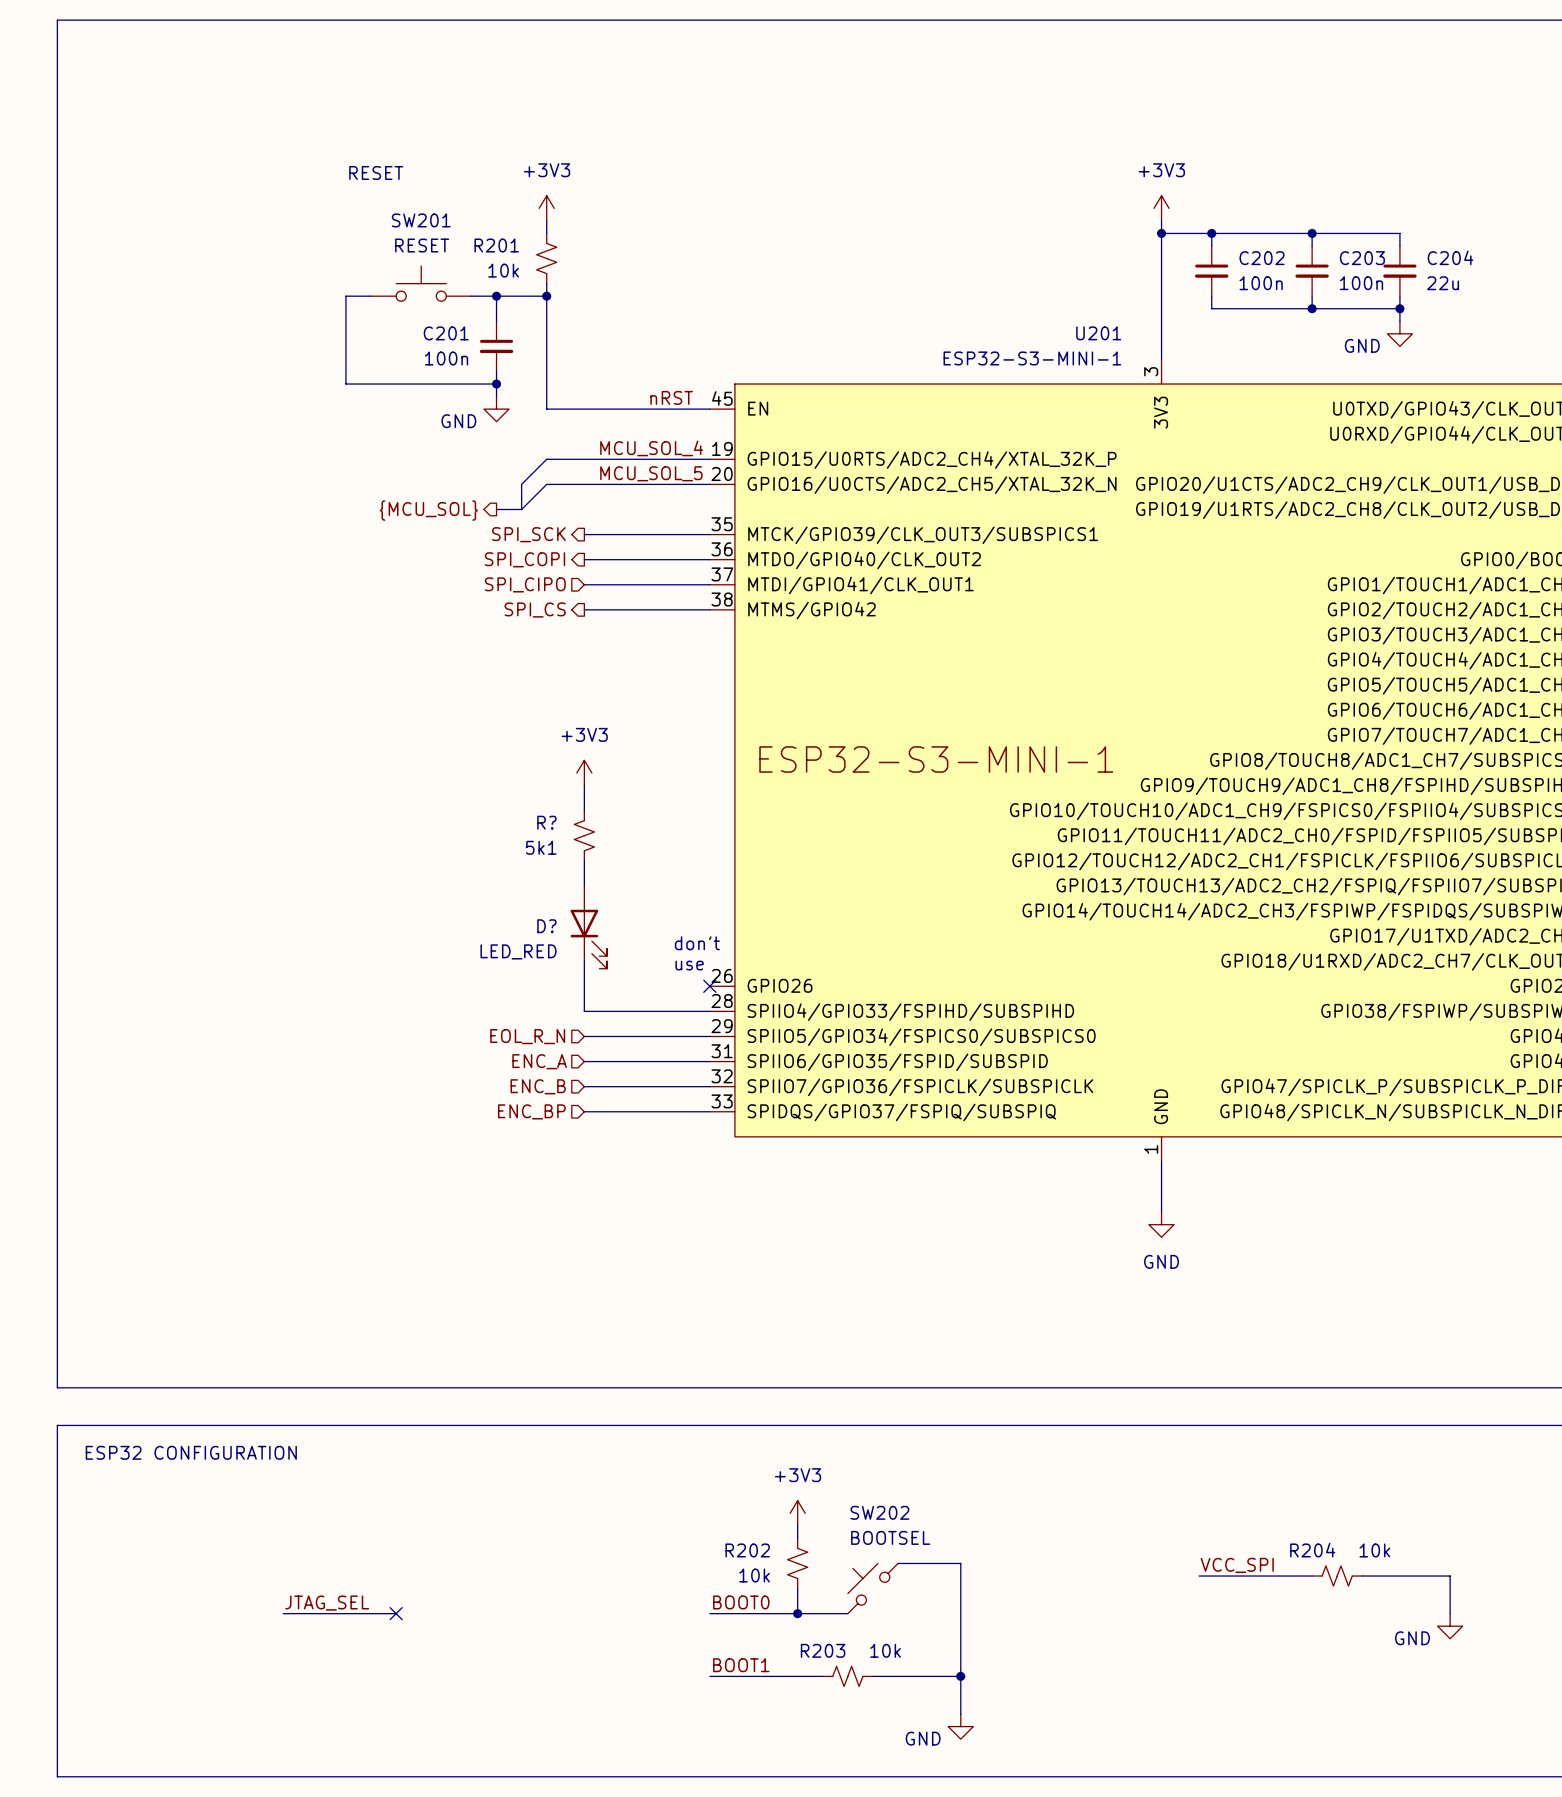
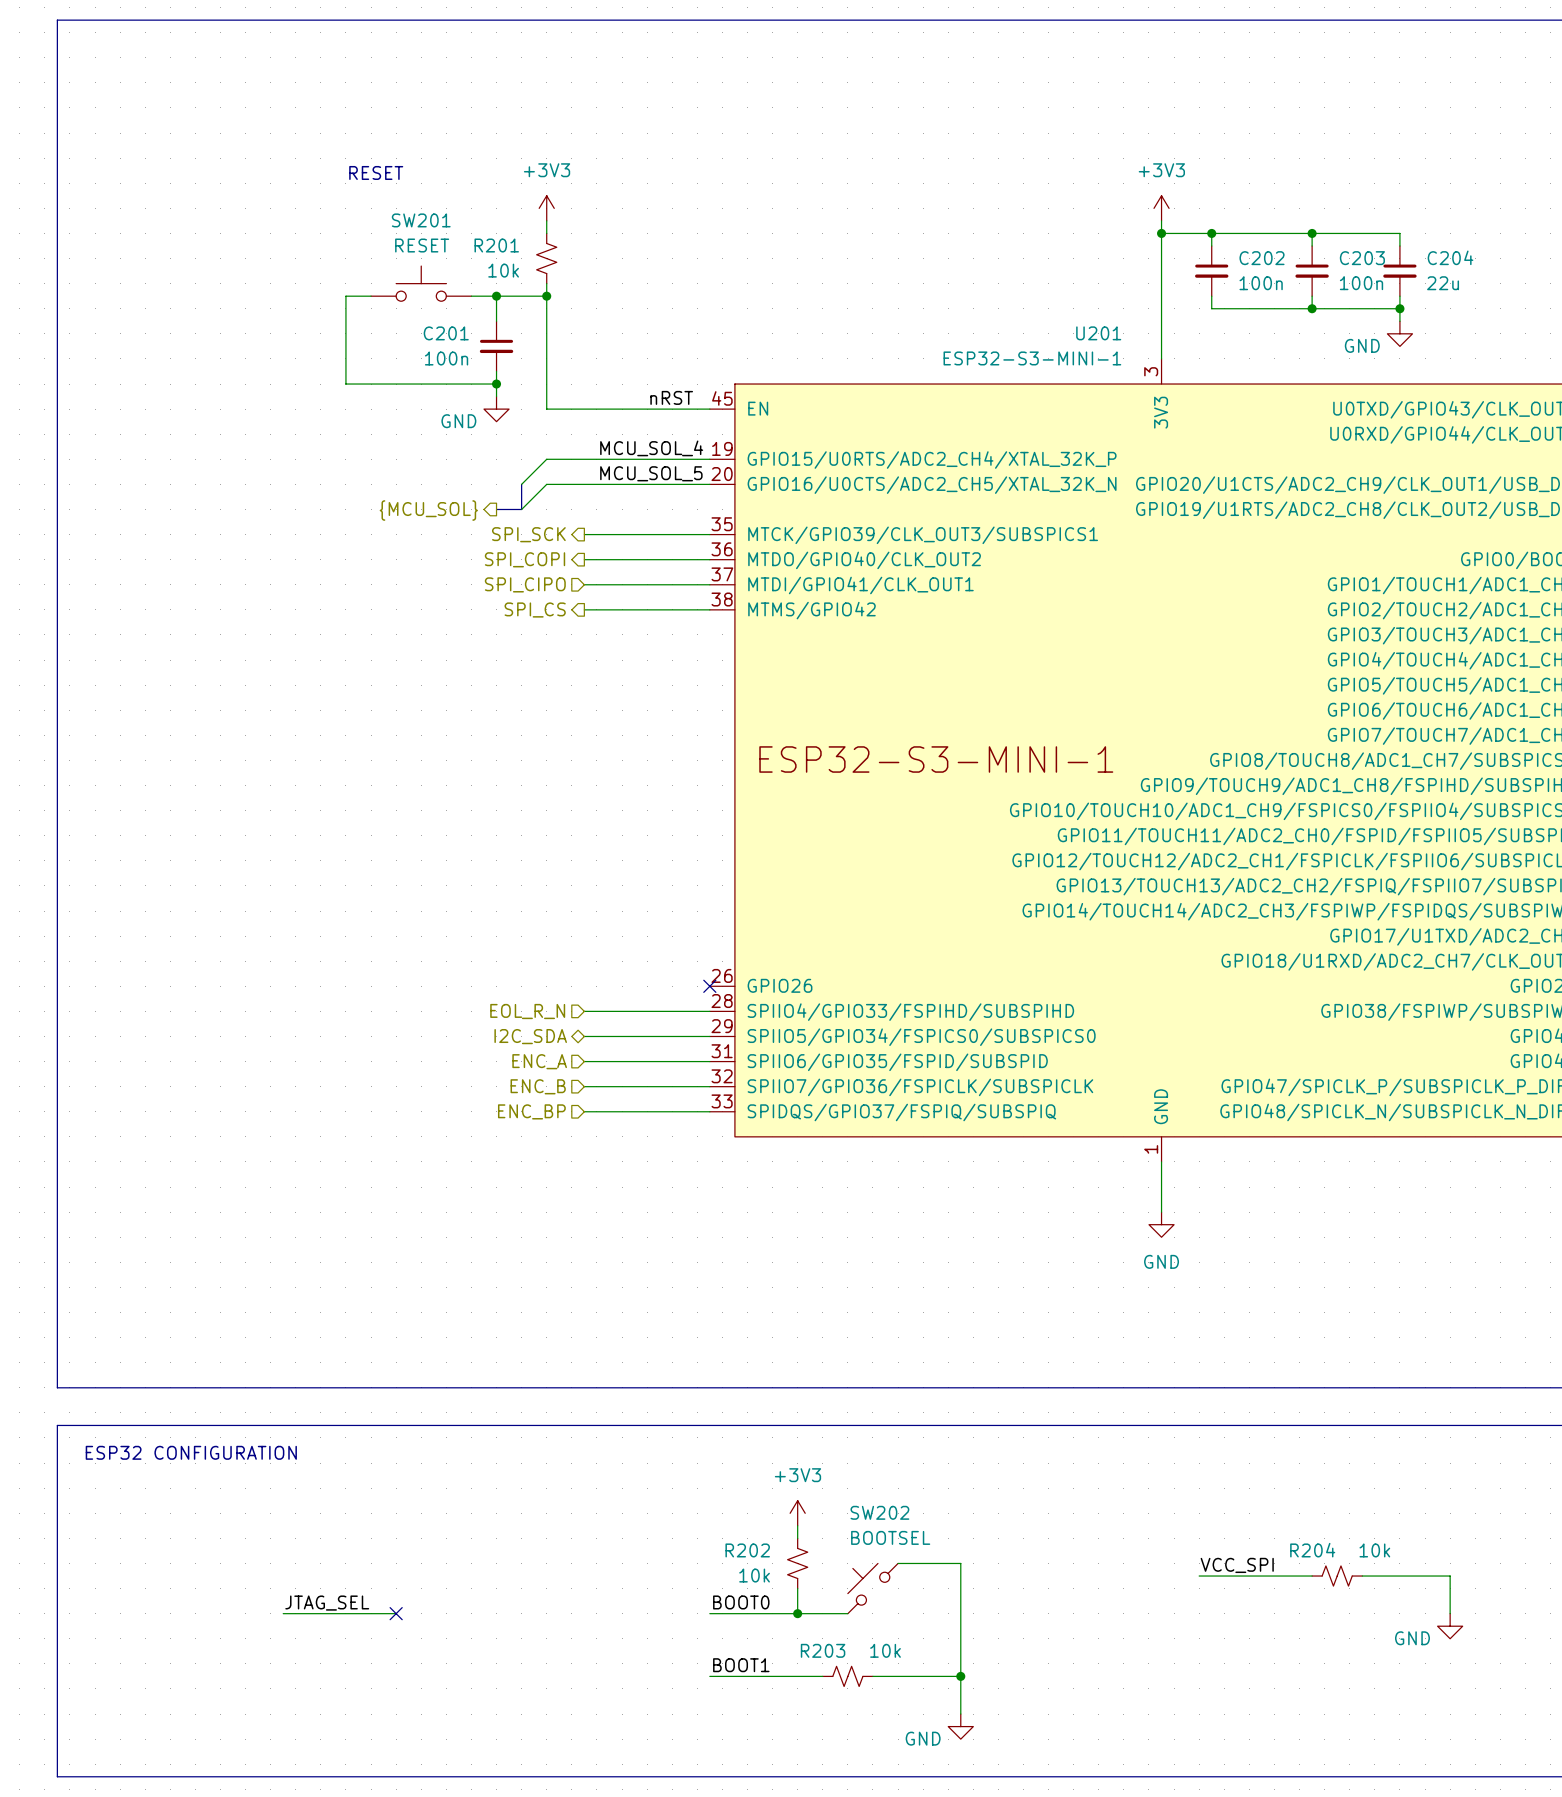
power symbol: +3V3 (584, 772) -> none
wire: (584, 785) (584, 810) -> none
R?: 5k1 (584, 835) -> none
wire: (584, 860) (584, 885) -> none
D?: LED_RED (588, 927) -> none
text: don't (697, 943) -> none
wire: (584, 961) (584, 1011) -> none
text: use (689, 965) -> none
hierarchical label: none -> EOL_R_N (527, 1011)
hierarchical label shape: input (527, 1036) -> bidirectional (530, 1036)
hierarchical label: EOL_R_N (527, 1036) -> I2C_SDA (530, 1036)

